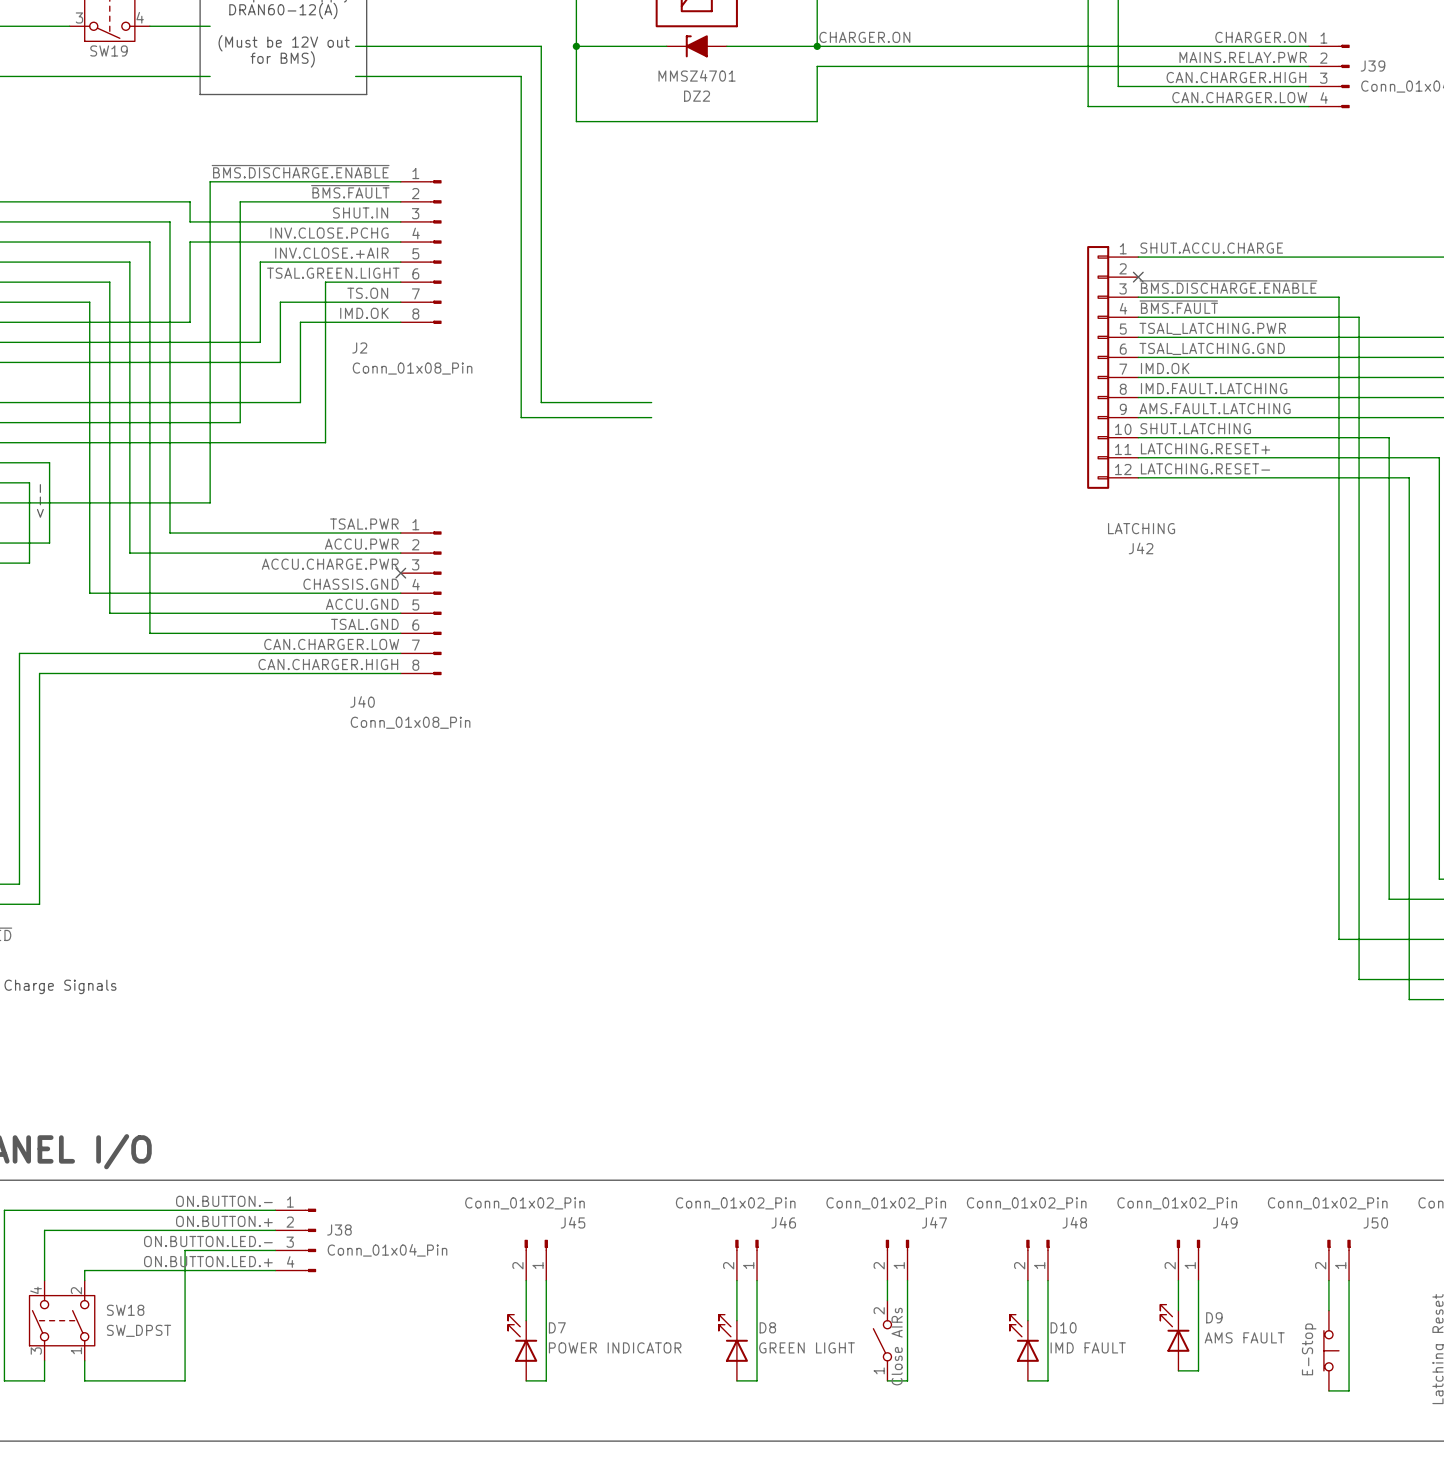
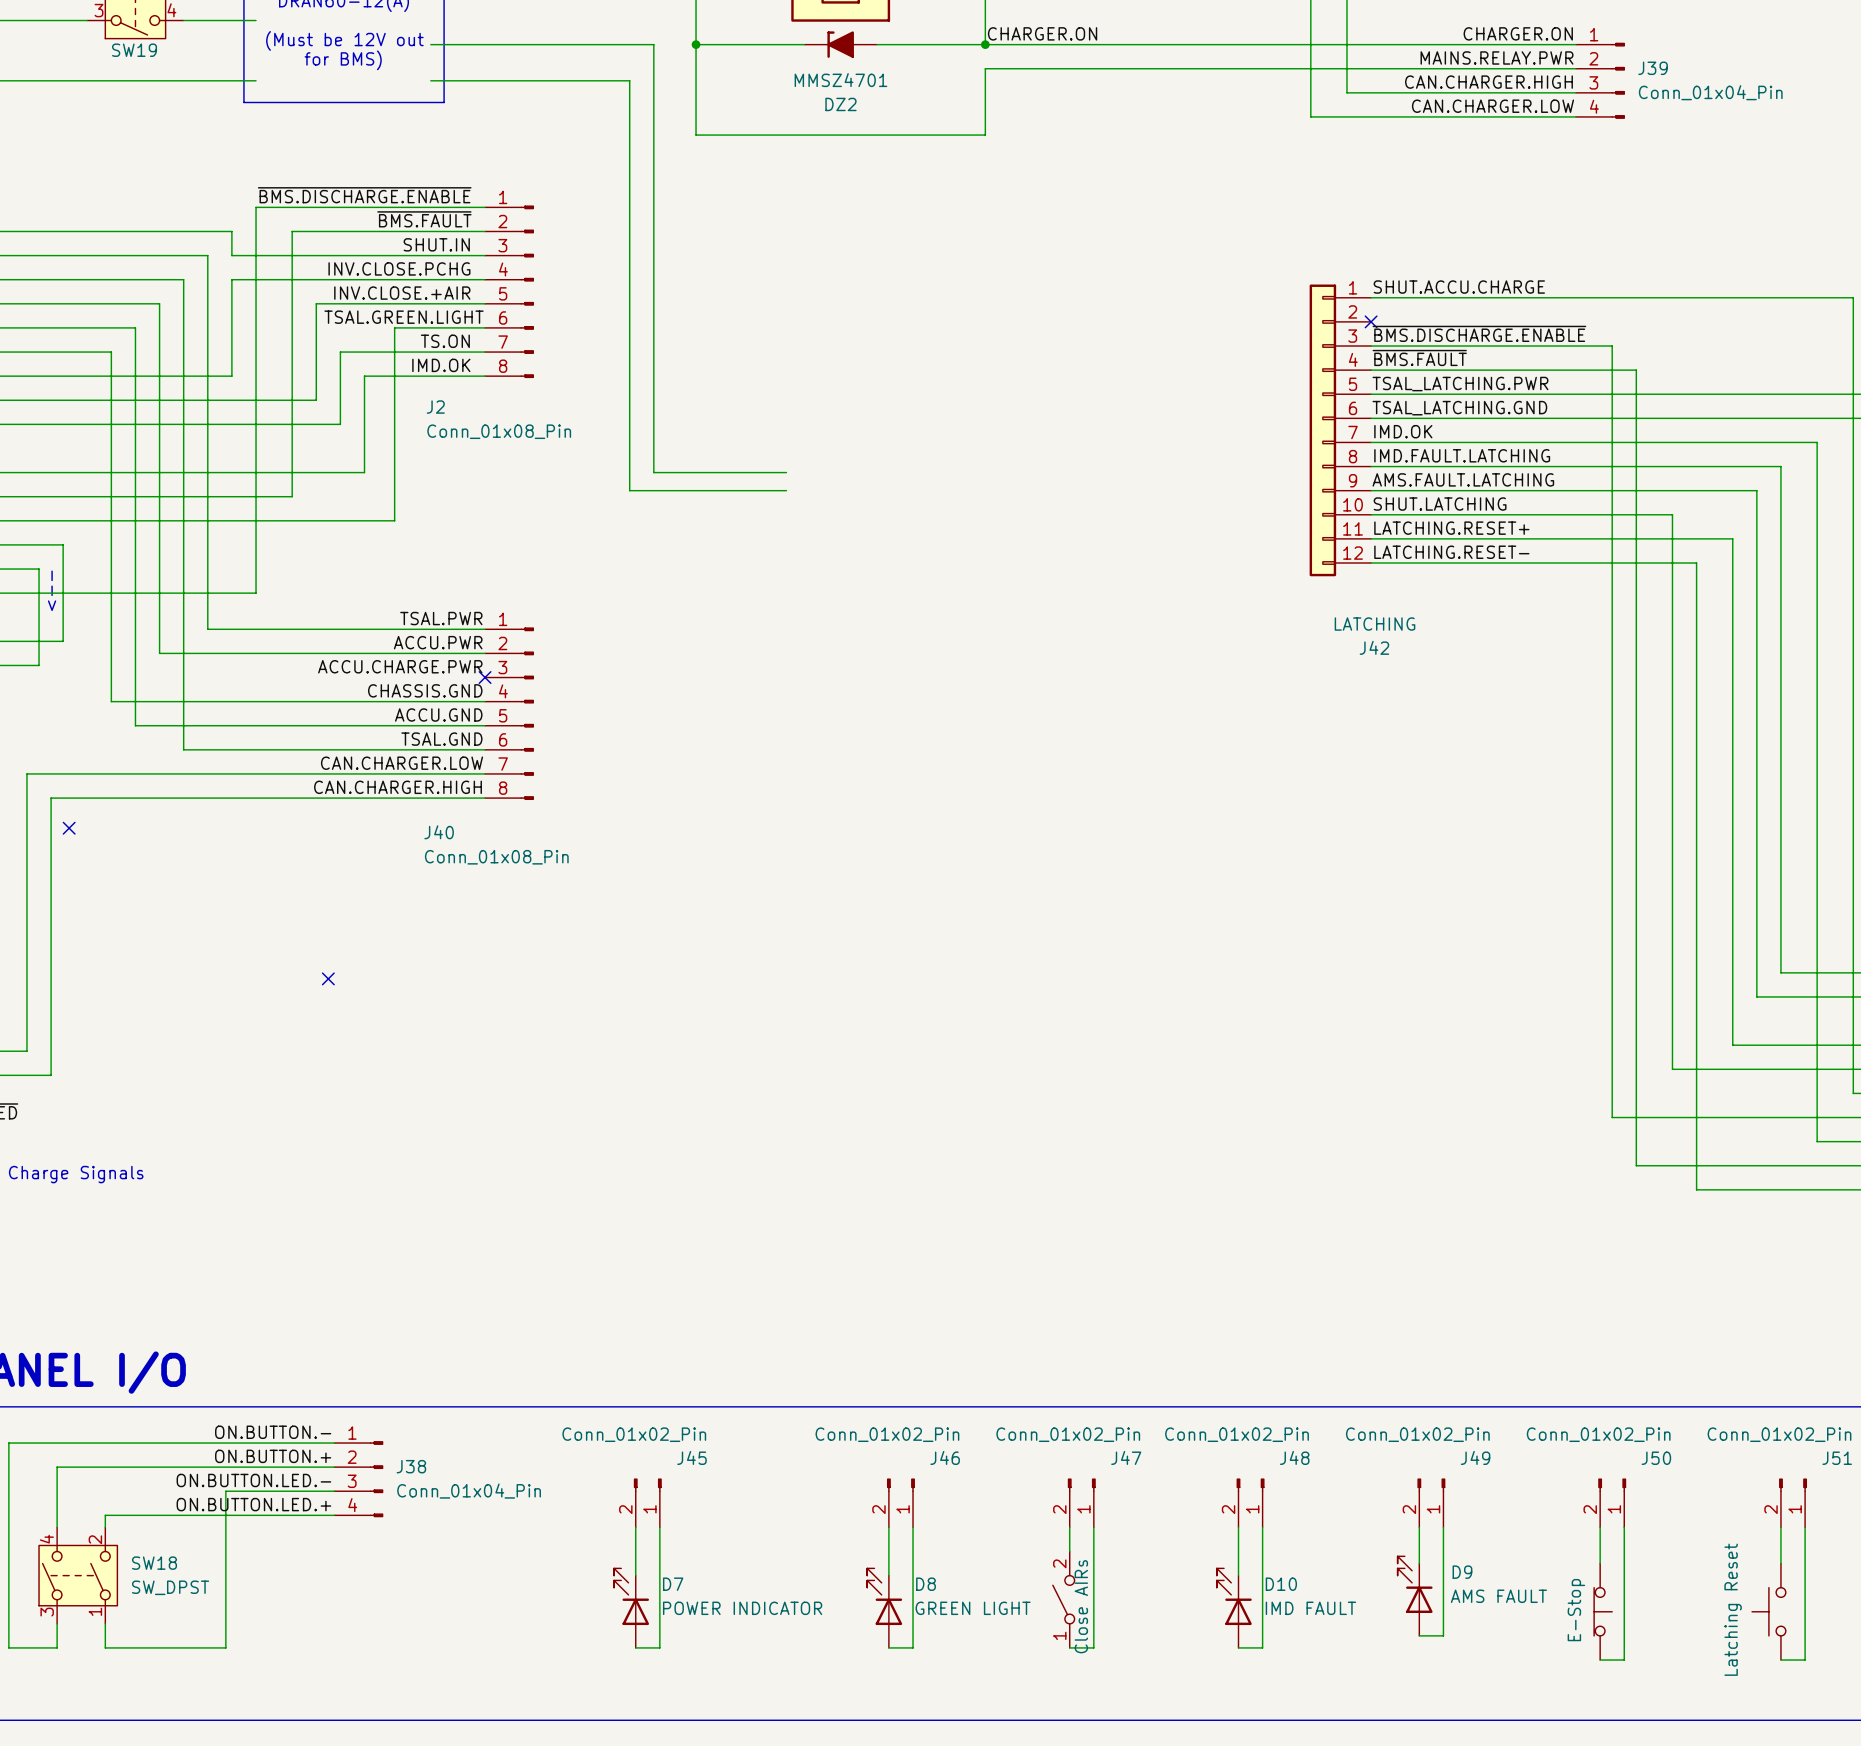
no-connect mark: none -> (69, 828)
no-connect mark: none -> (328, 978)

